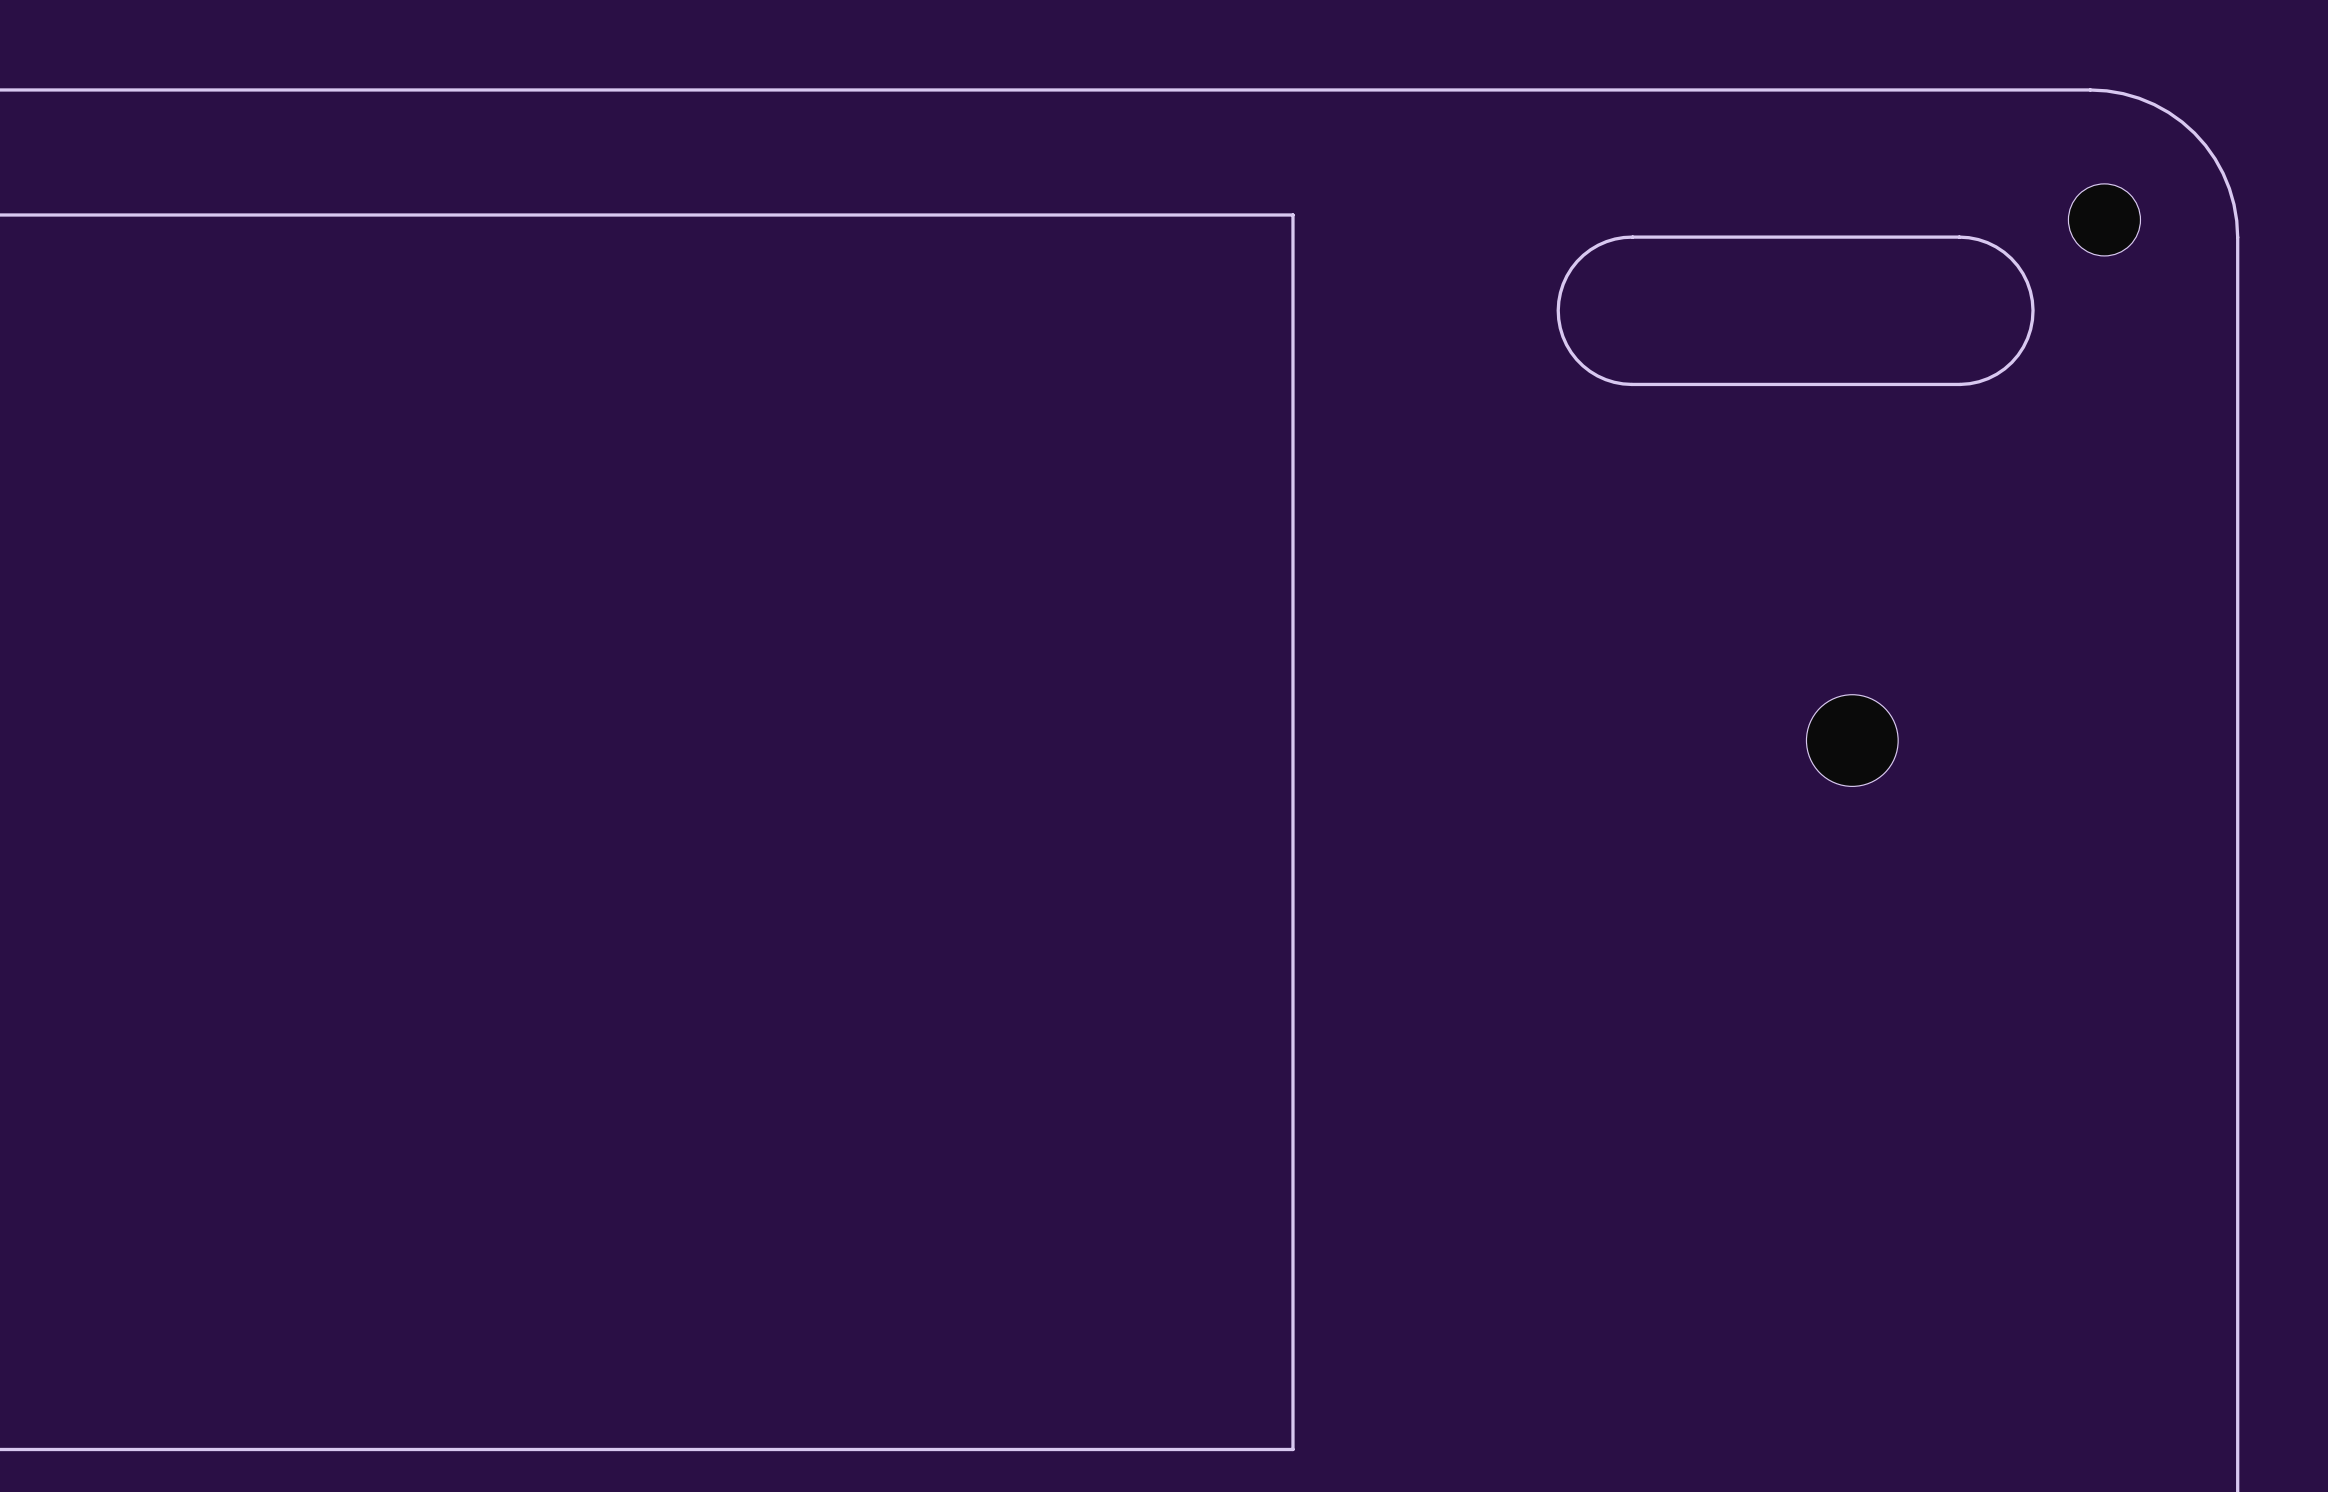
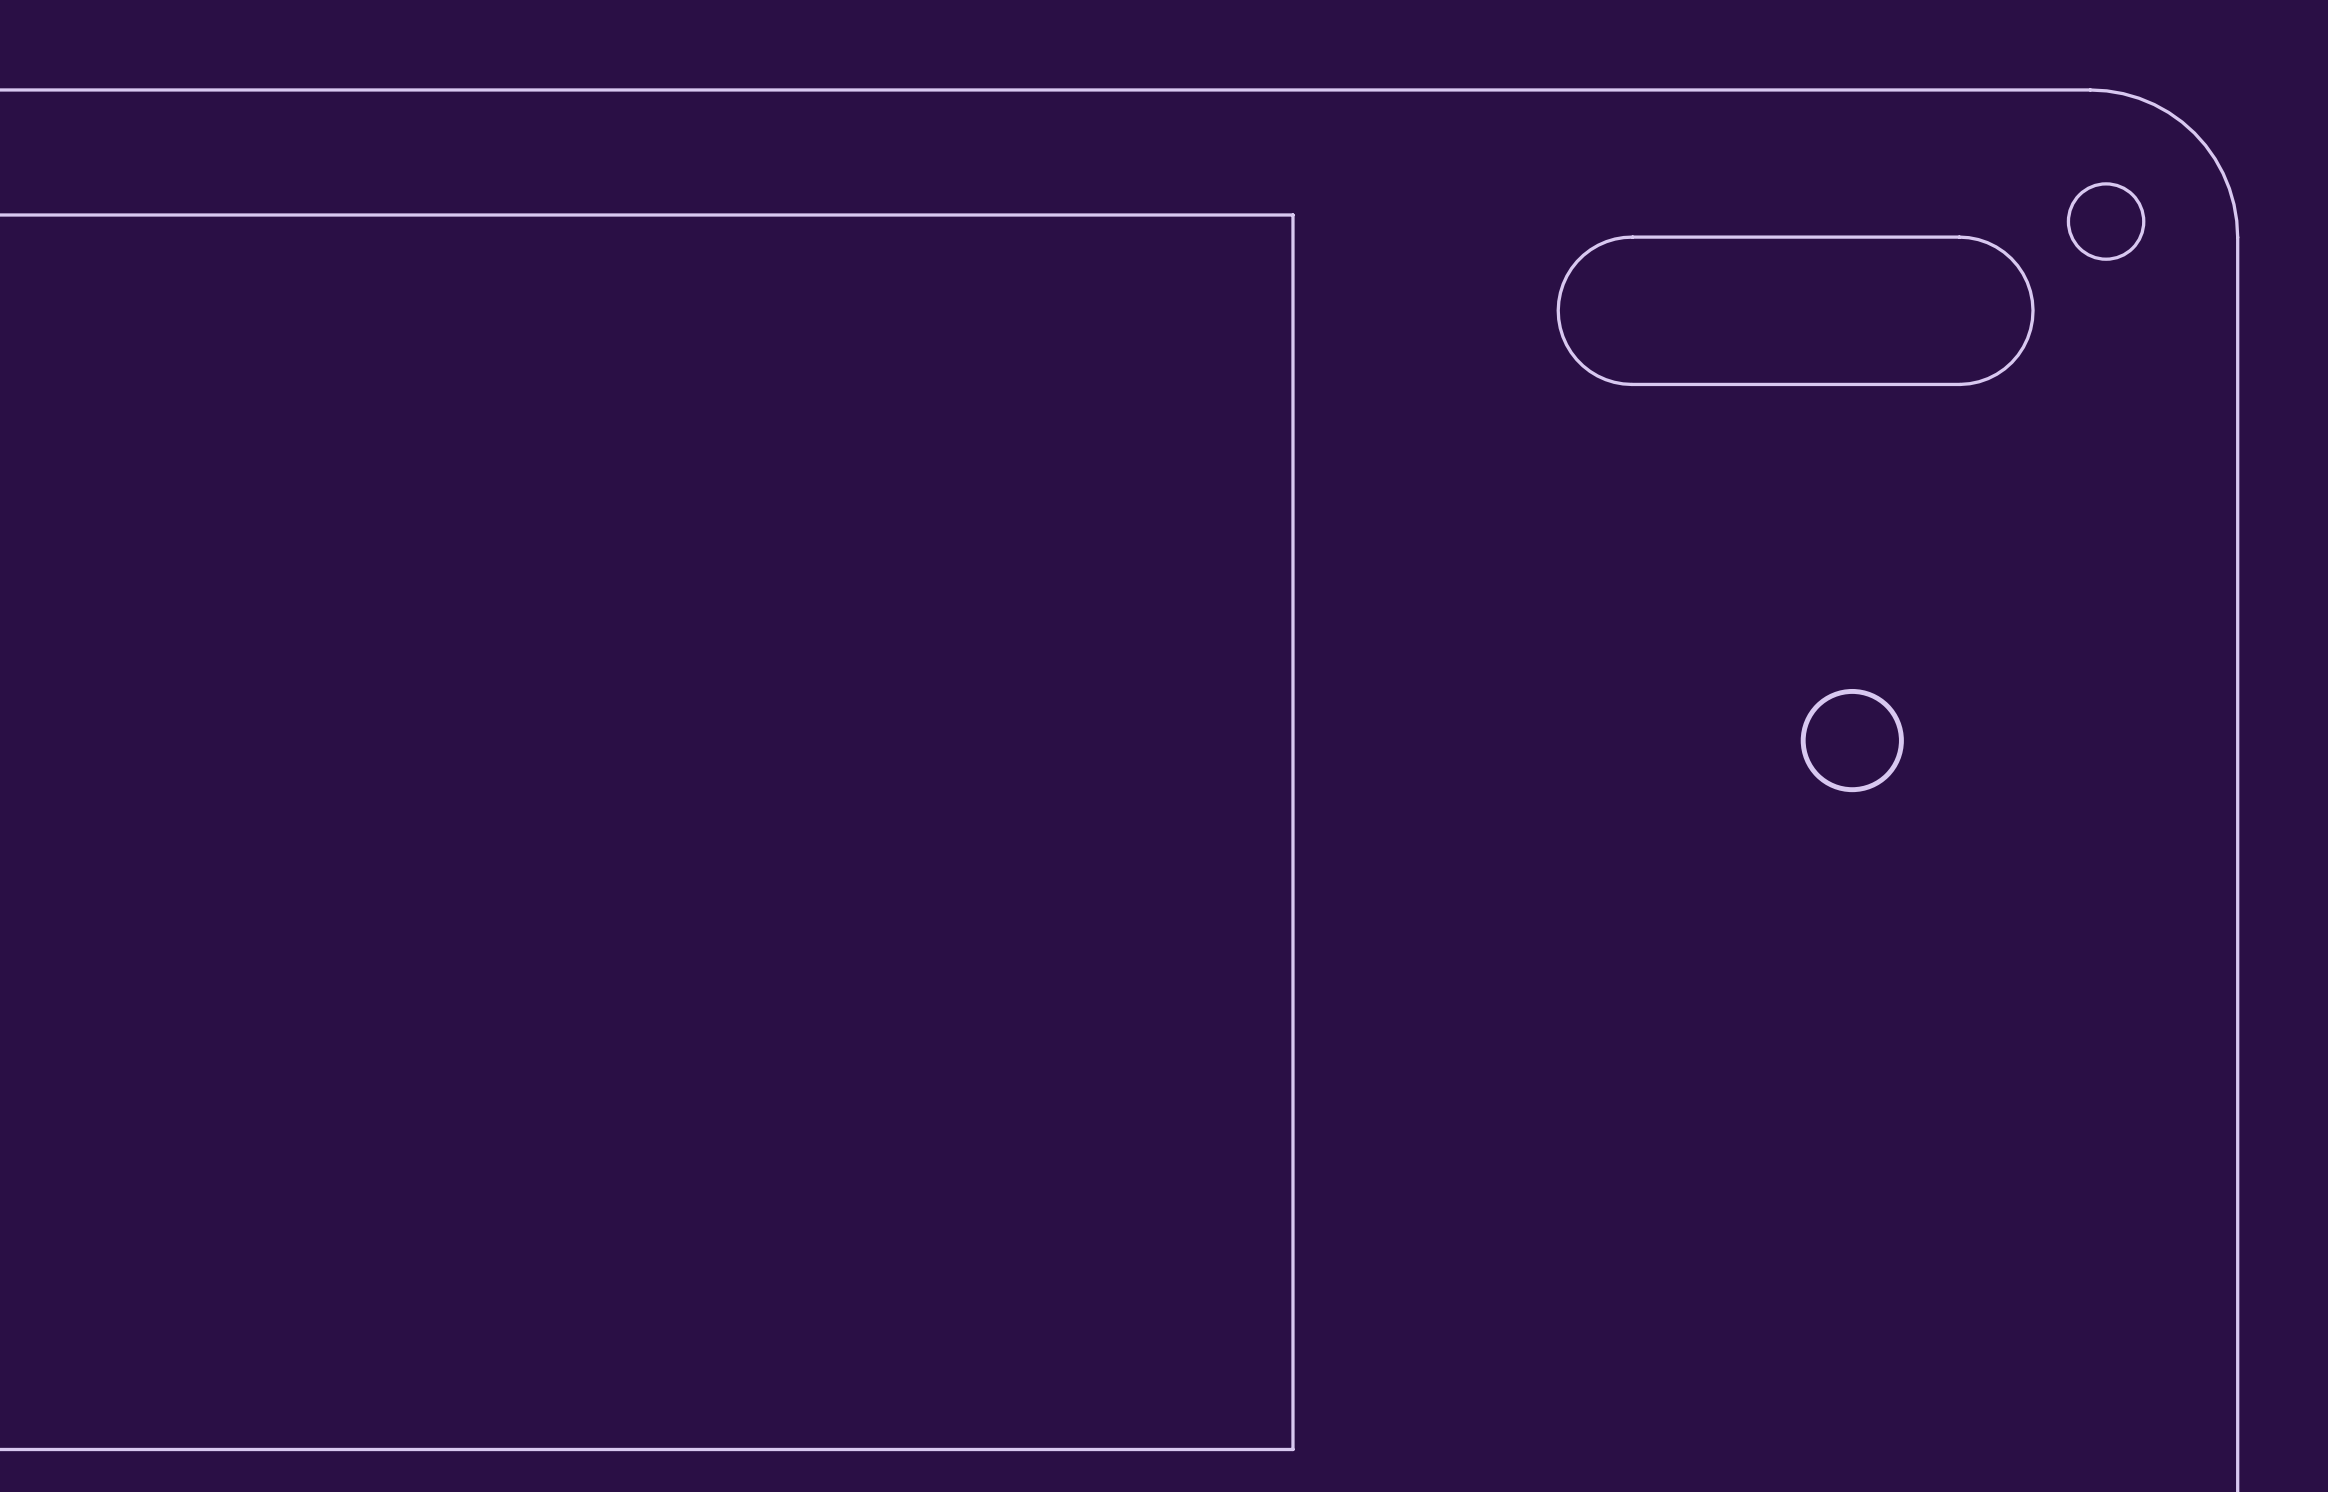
round board edge: none -> [2066, 182, 2146, 261]
part: (2104, 219) -> none
round board edge: none -> [1800, 688, 1904, 793]
part: (1852, 740) -> none

